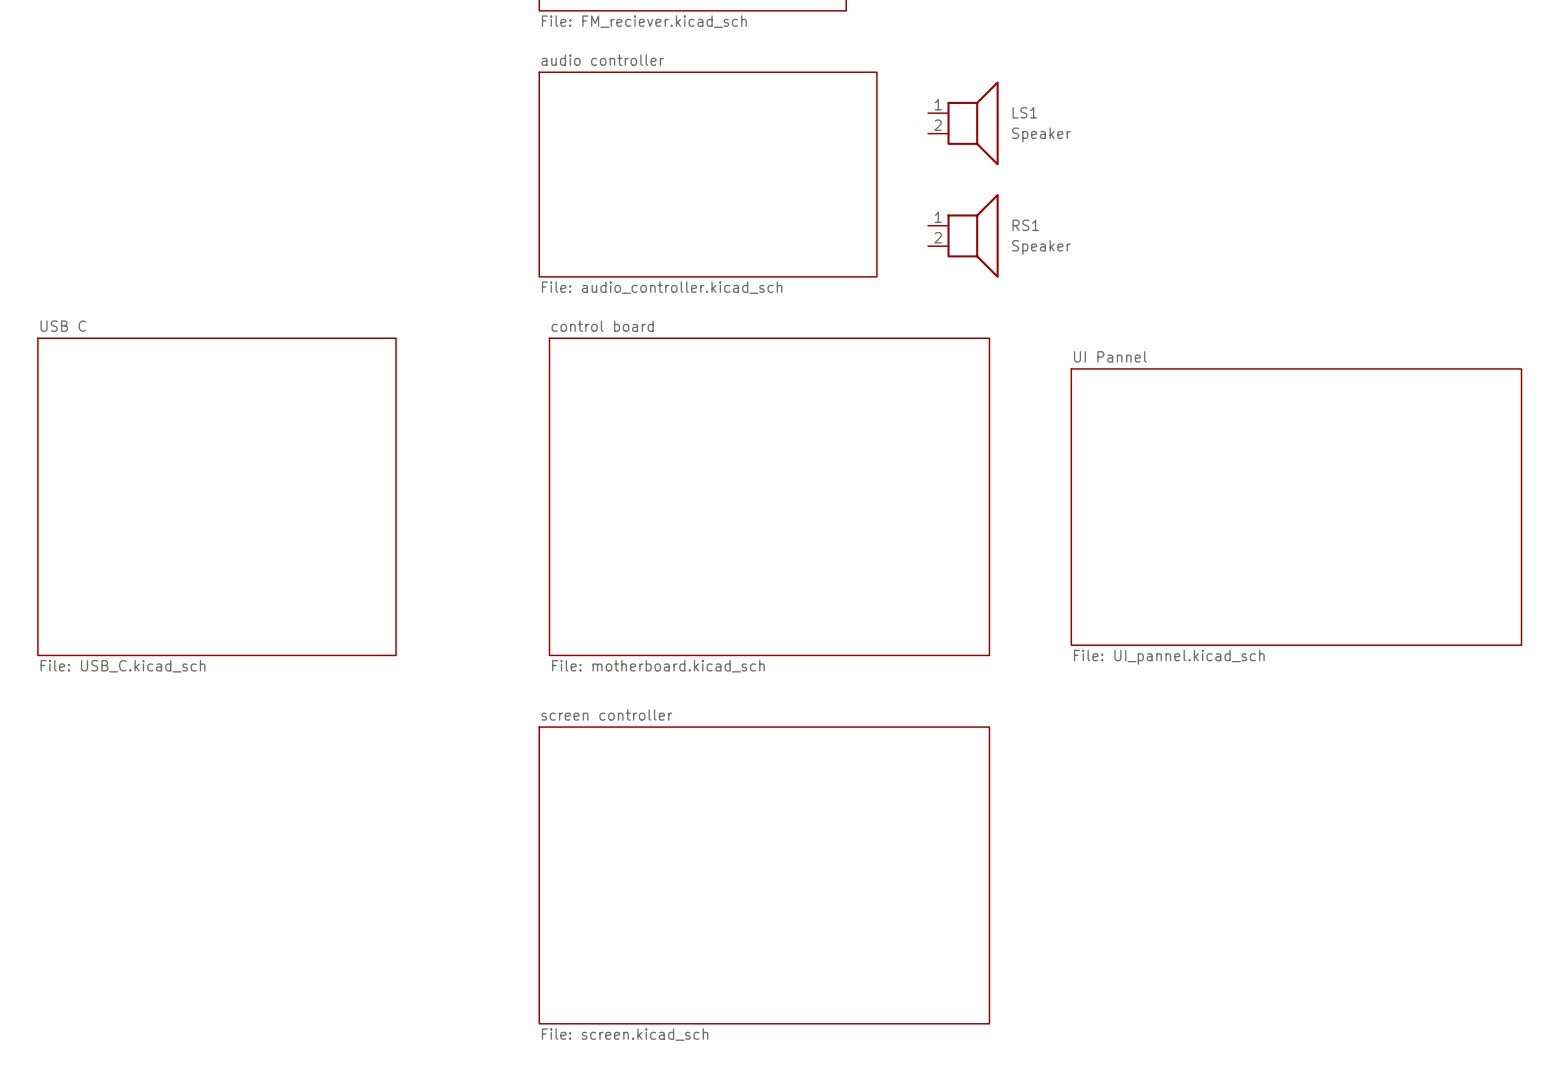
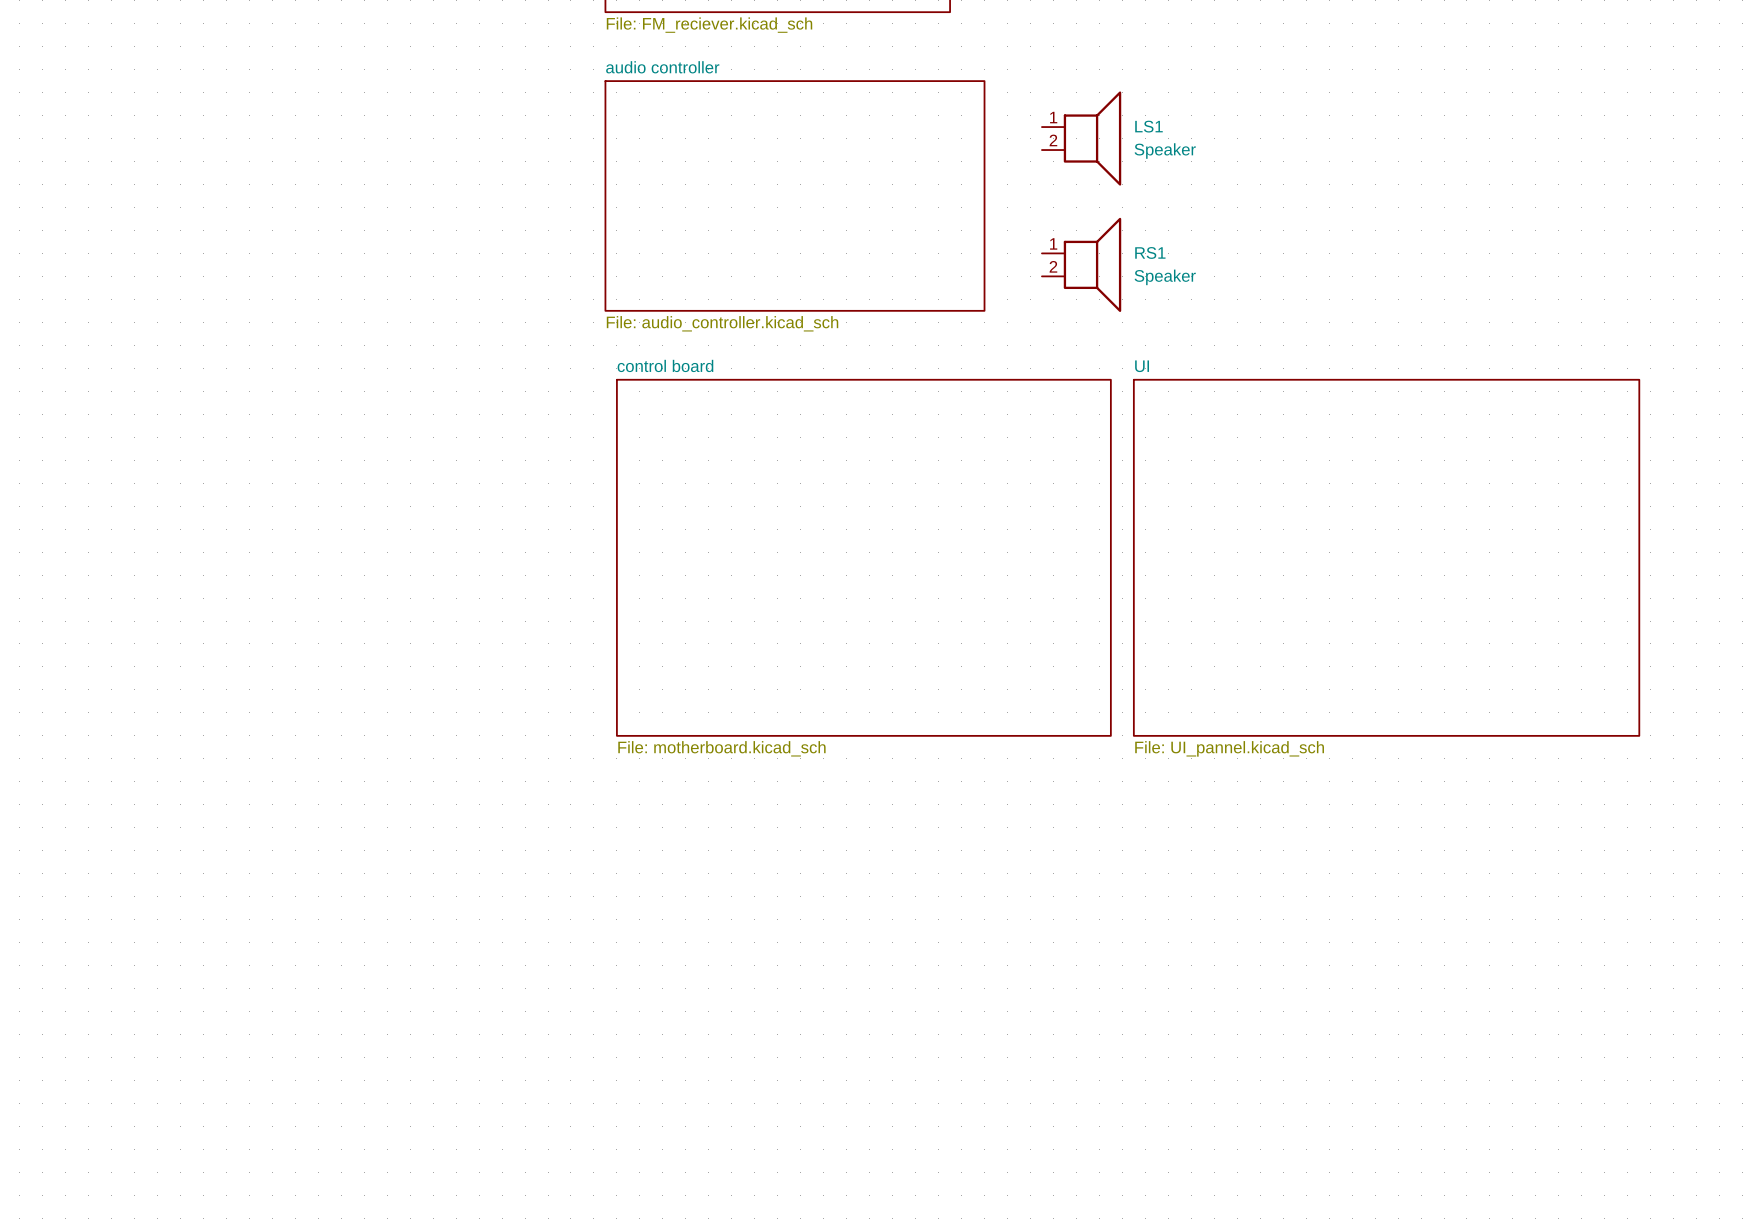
sheet USB C: File: USB_C.kicad_sch (216, 496) -> none
sheet UI: none -> File: UI_pannel.kicad_sch (1386, 557)
sheet UI Pannel: File: UI_pannel.kicad_sch (1296, 507) -> none
sheet screen controller: File: screen.kicad_sch (764, 875) -> none

